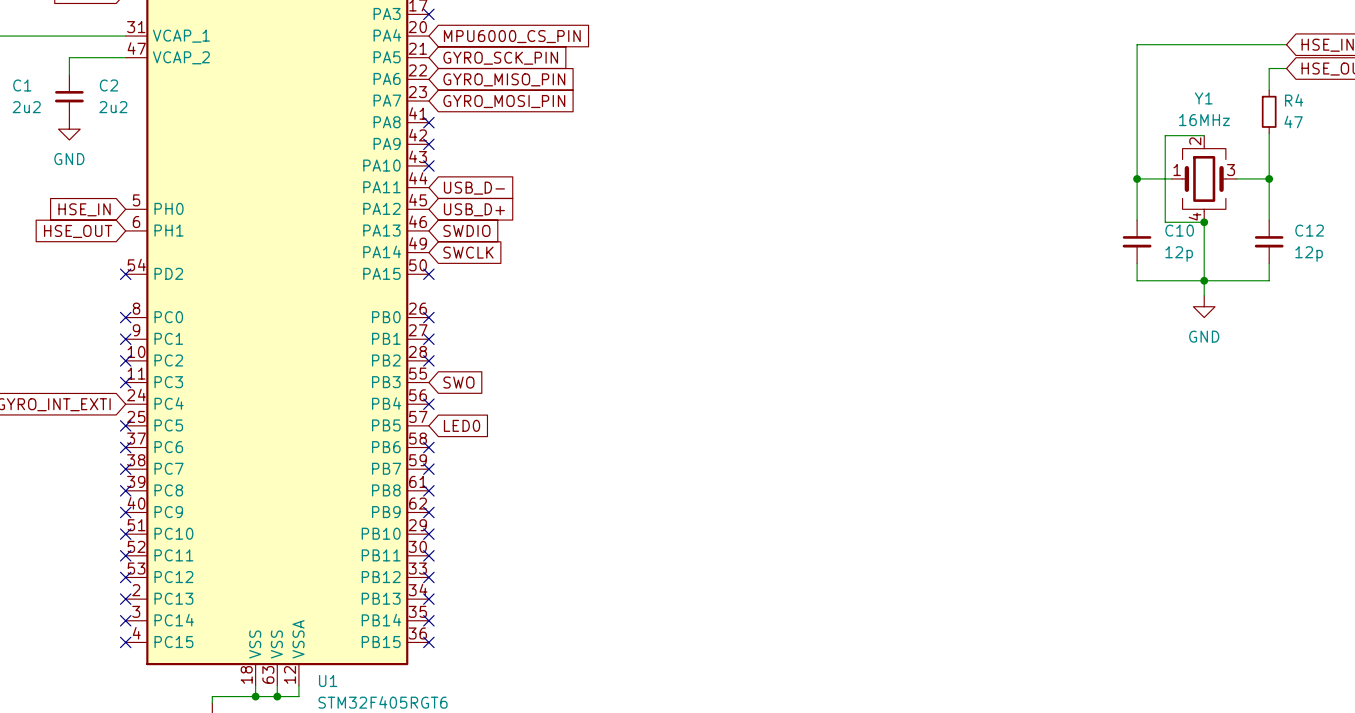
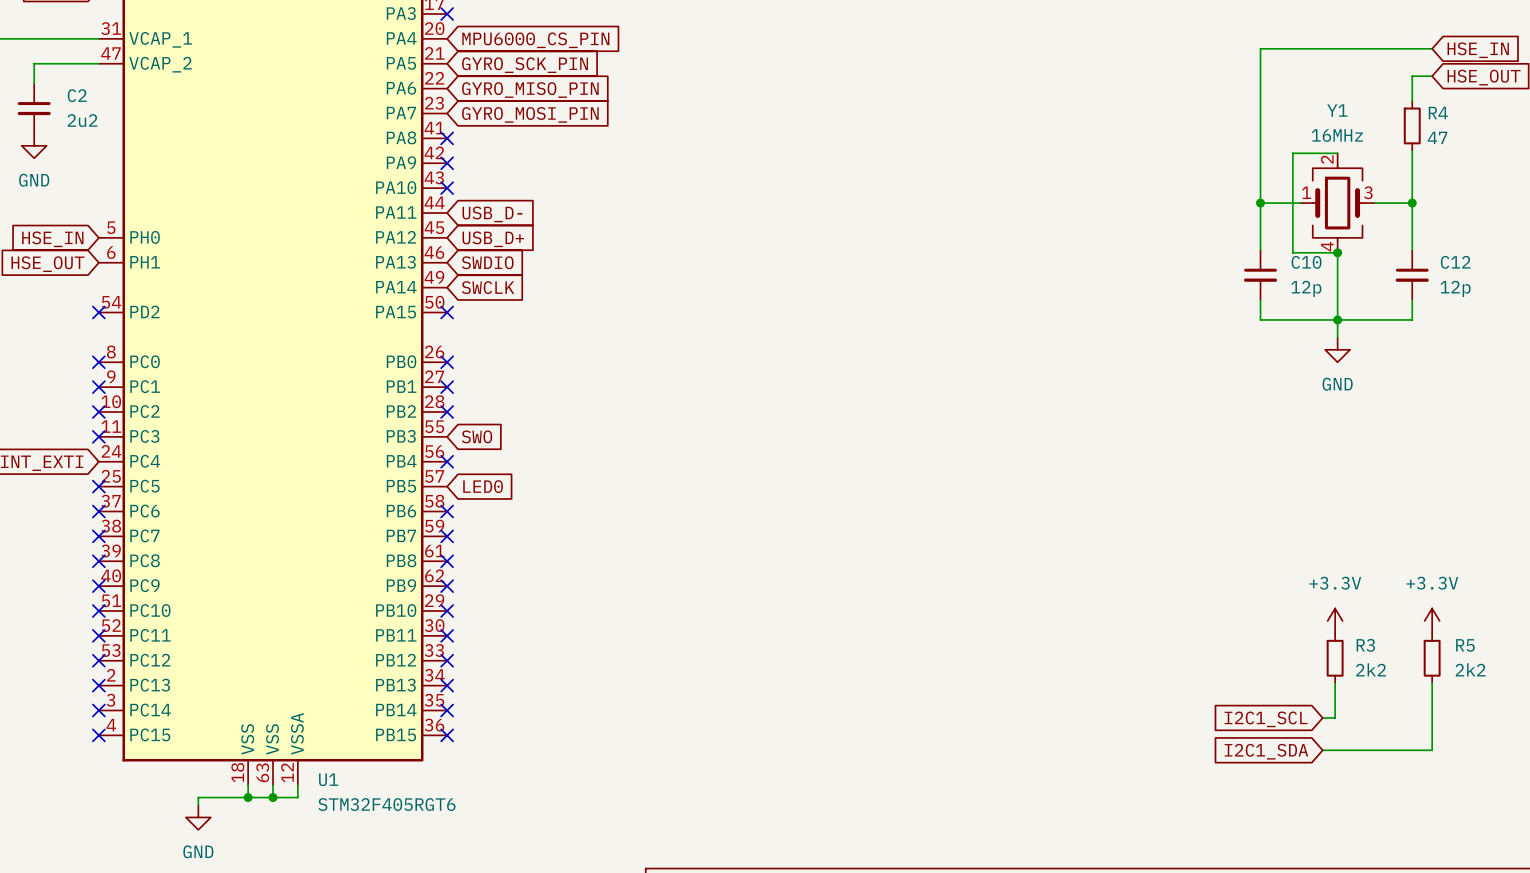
power symbol: none -> +3.3V (1335, 620)
power symbol: none -> +3.3V (1432, 620)
R3: none -> 2k2 (1335, 658)
R5: none -> 2k2 (1432, 658)
wire: none -> (1335, 683) (1335, 717) (1322, 717)
wire: none -> (1432, 683) (1432, 750) (1322, 750)
global label: none -> I2C1_SCL (1266, 719)
global label: none -> I2C1_SDA (1266, 751)

